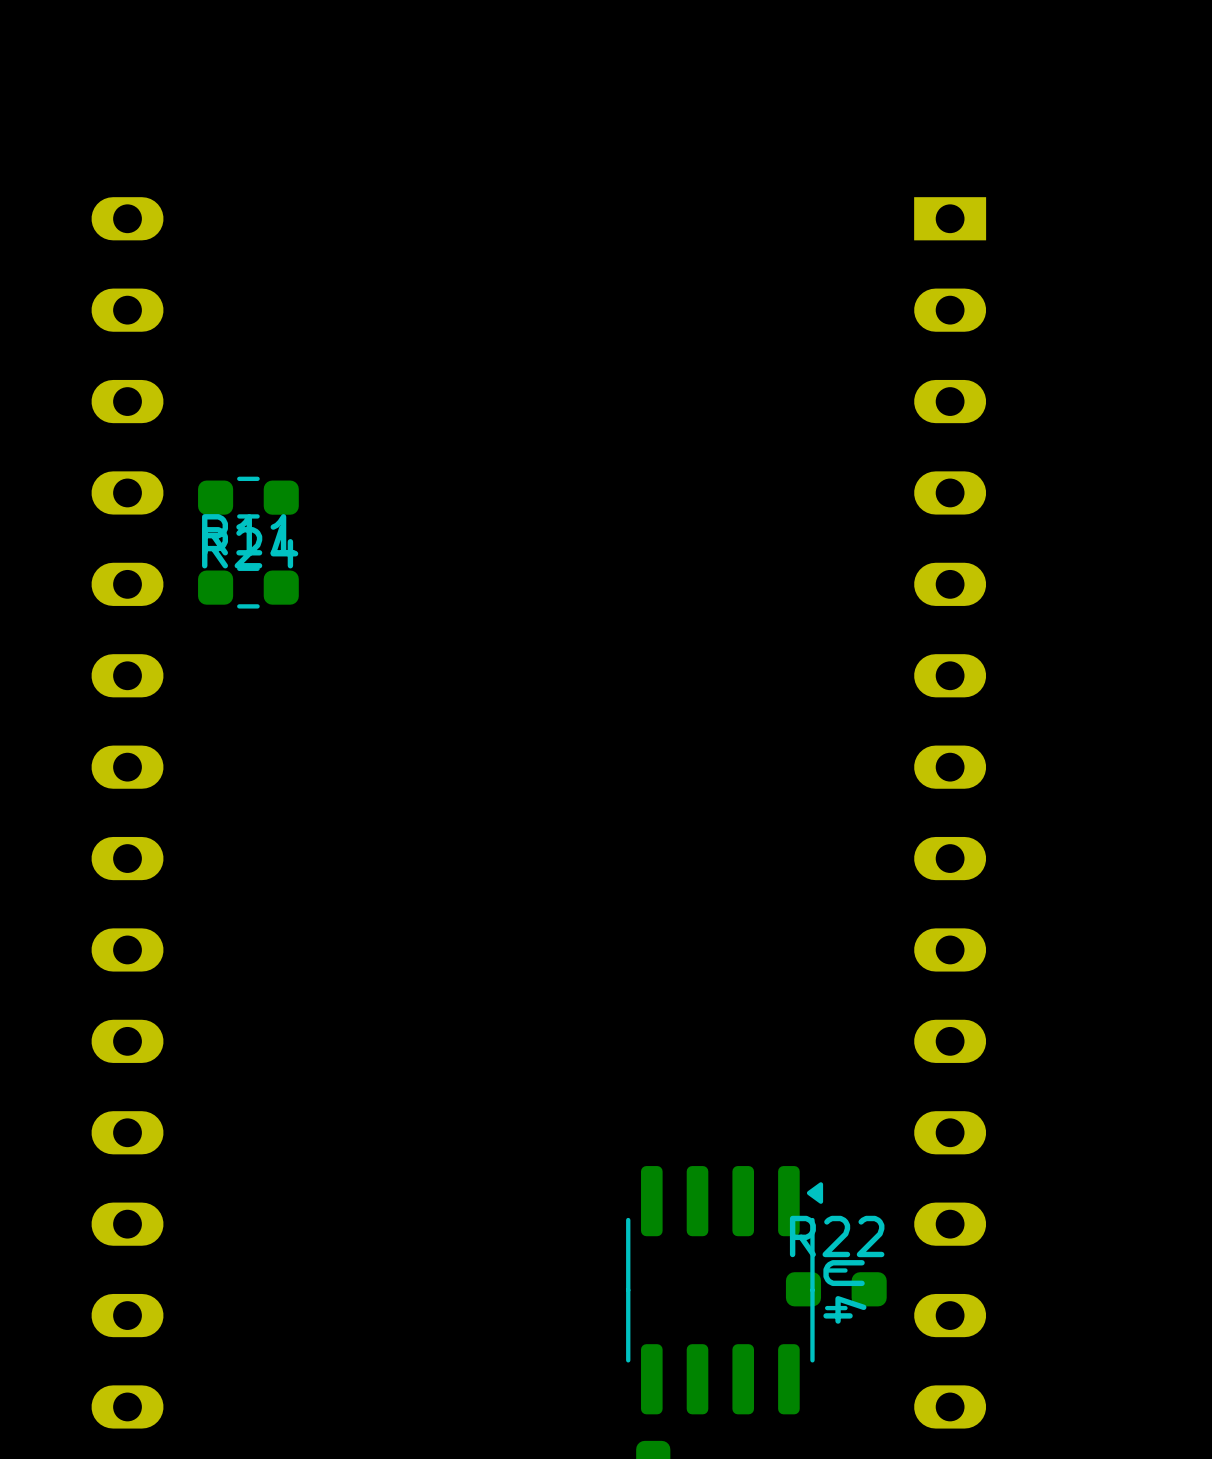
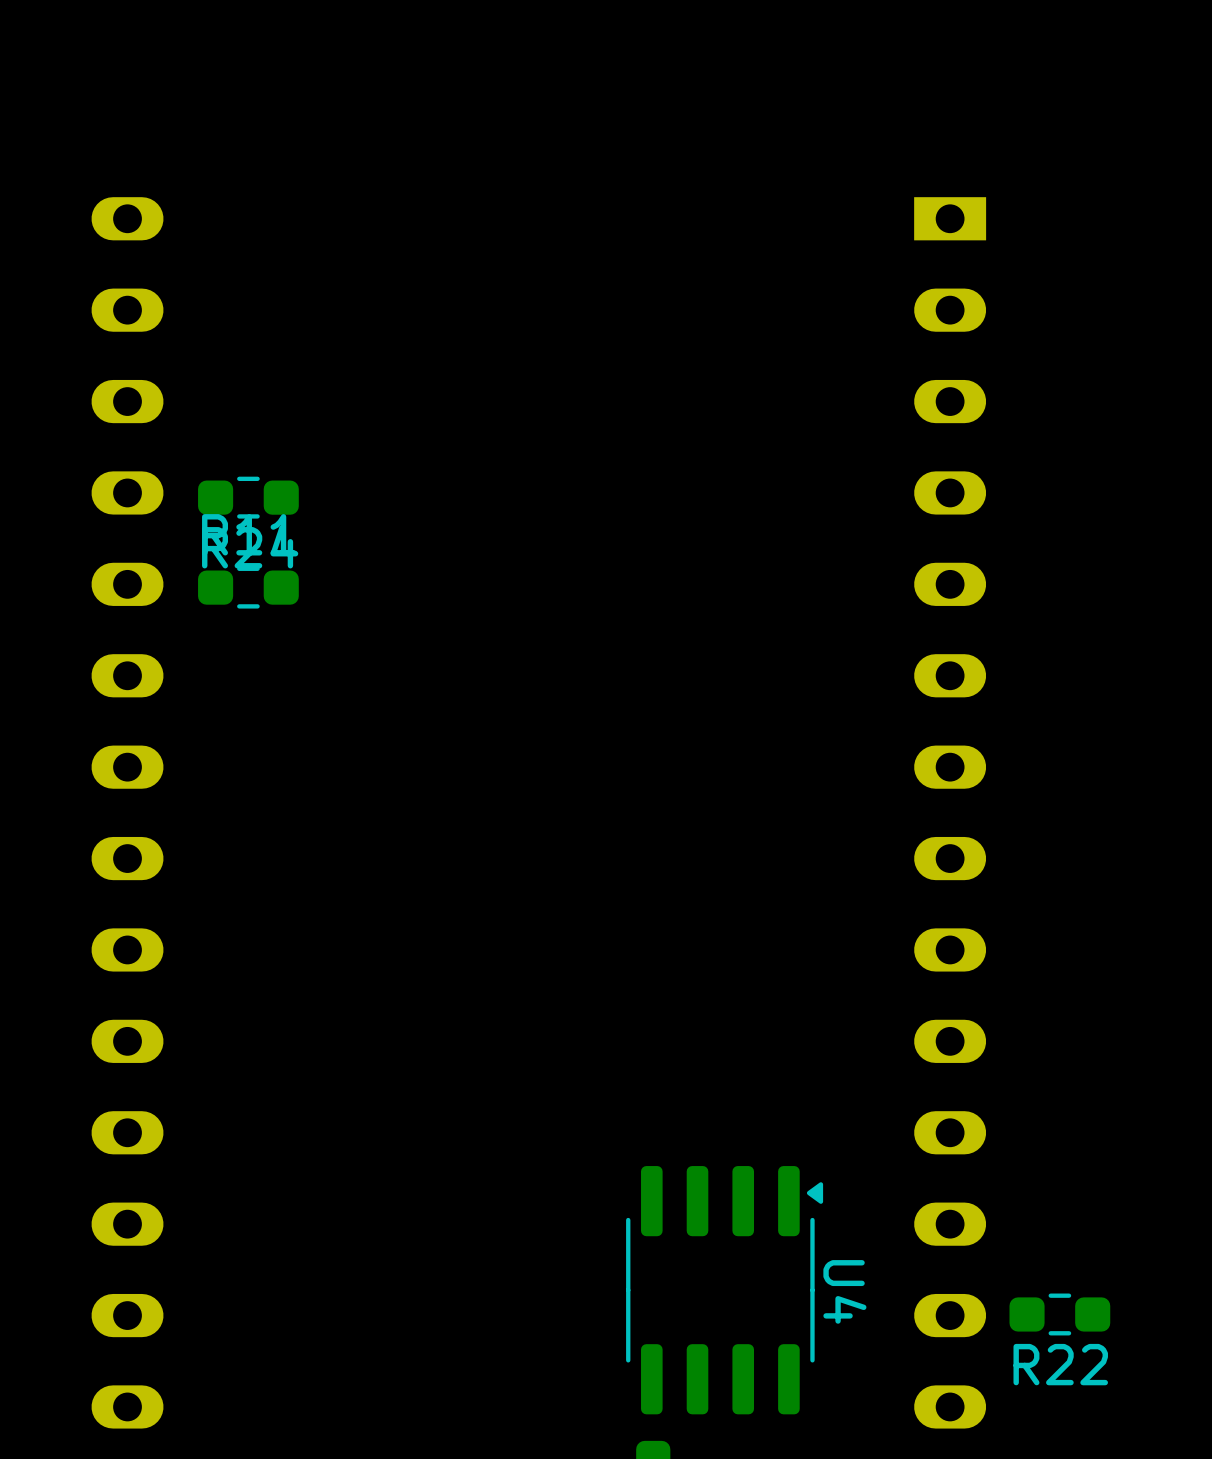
R22 name position: R22 (837, 1236) -> R22 (1060, 1364)
R22 position: (836, 1289) -> (1059, 1314)

